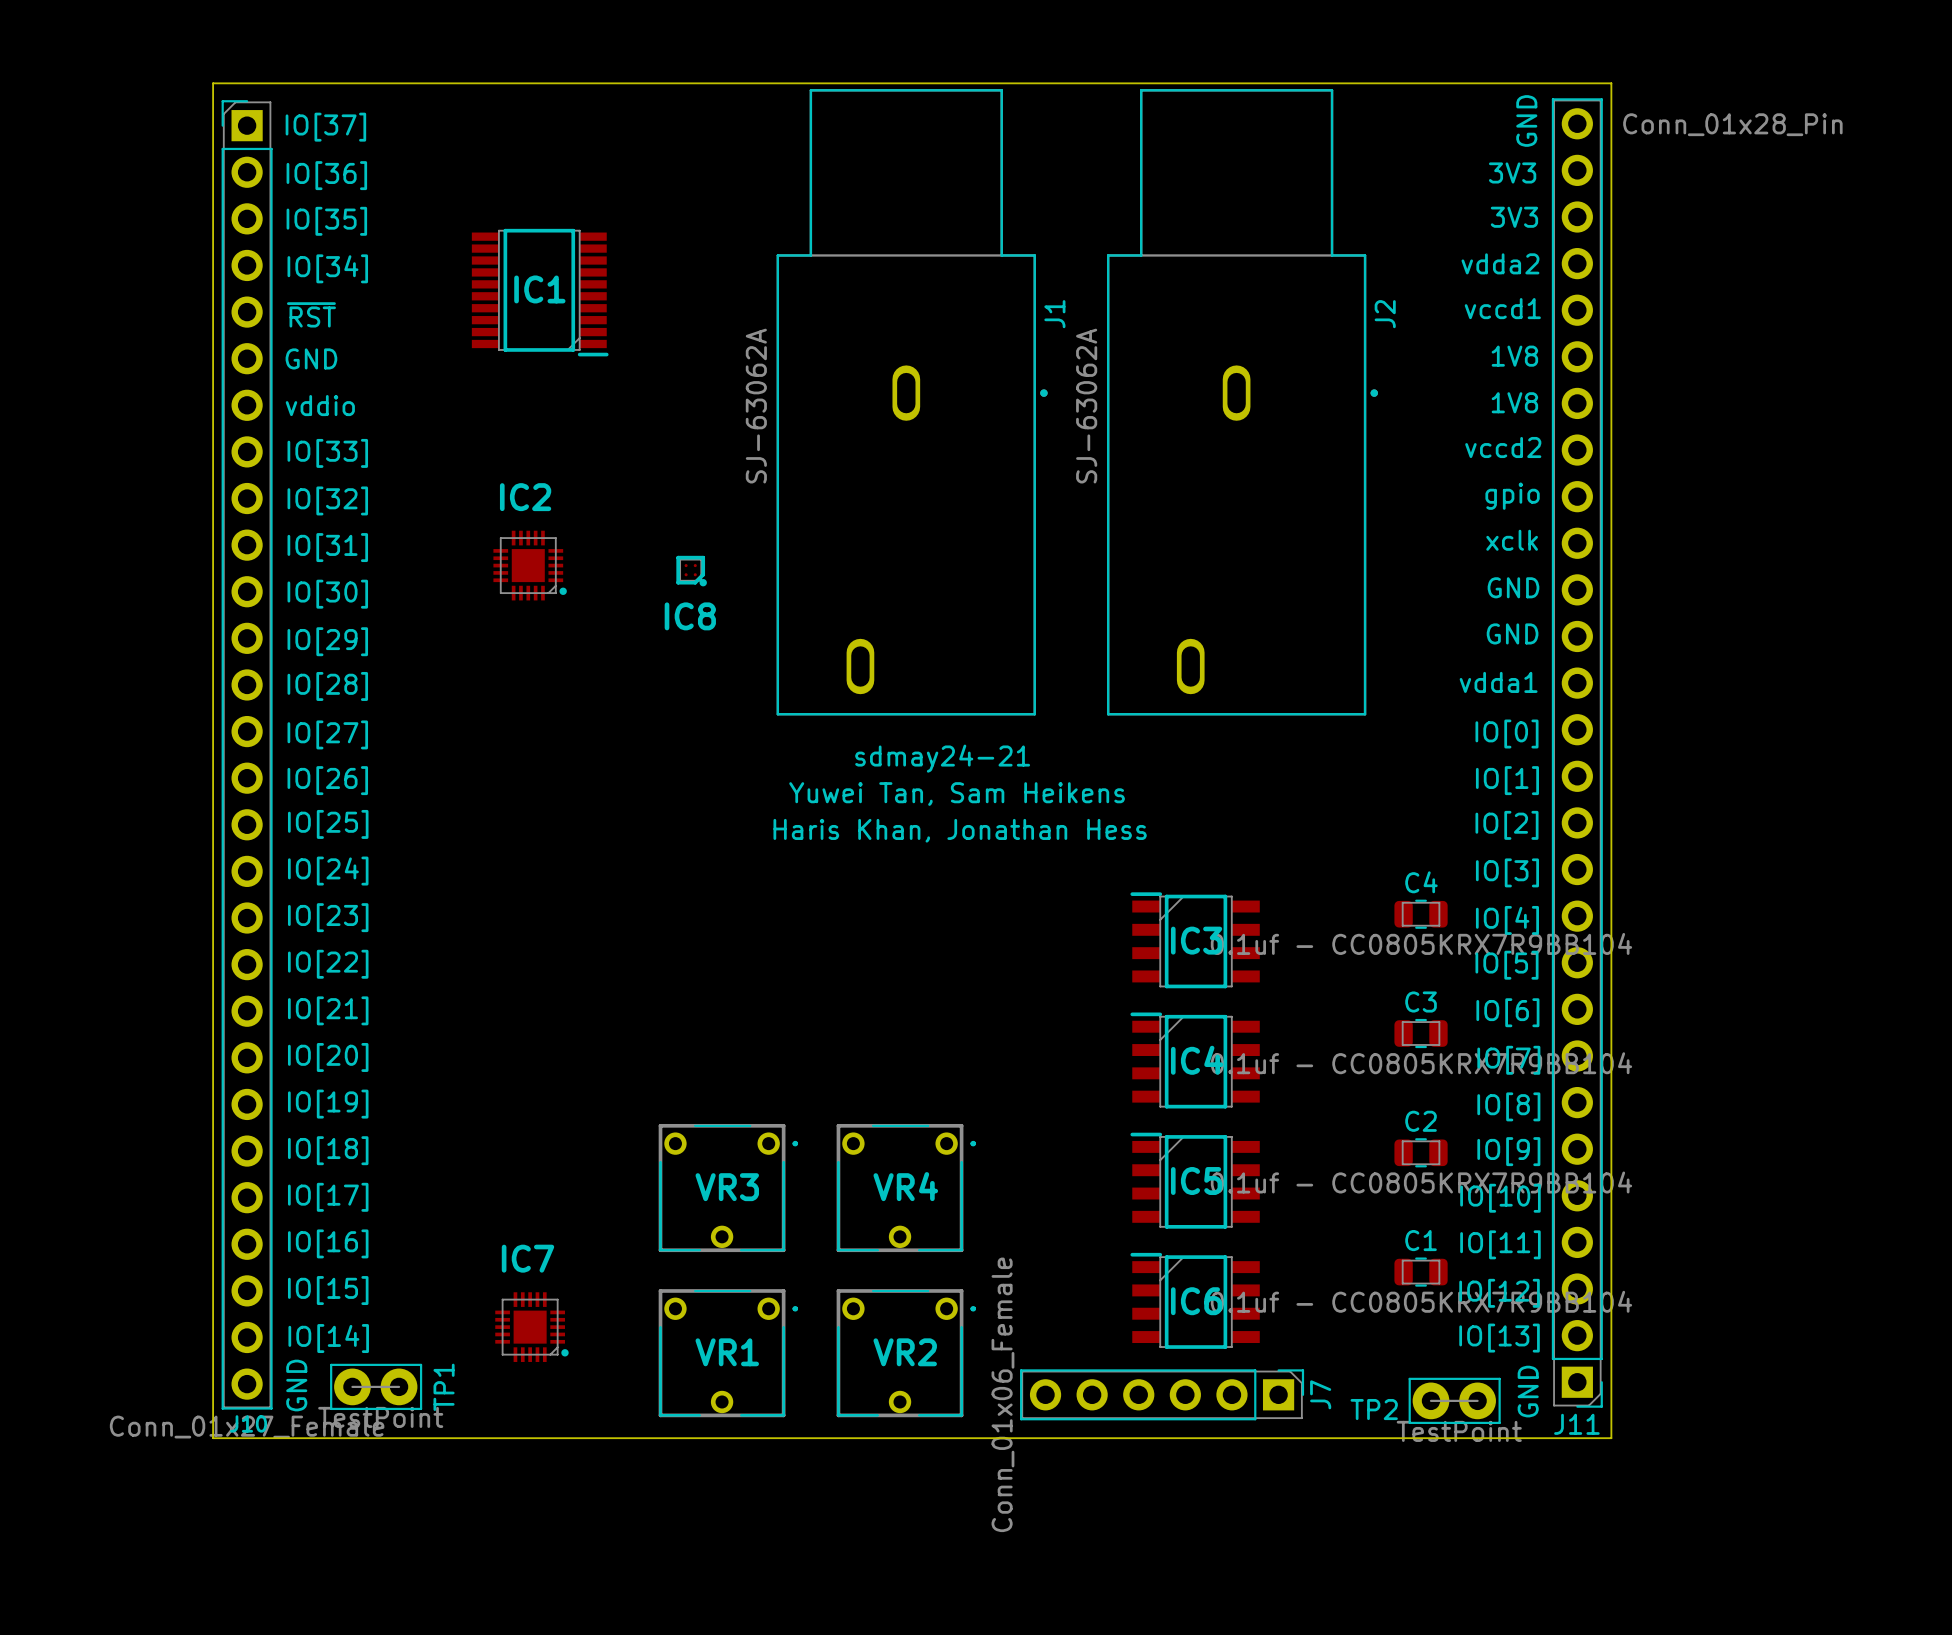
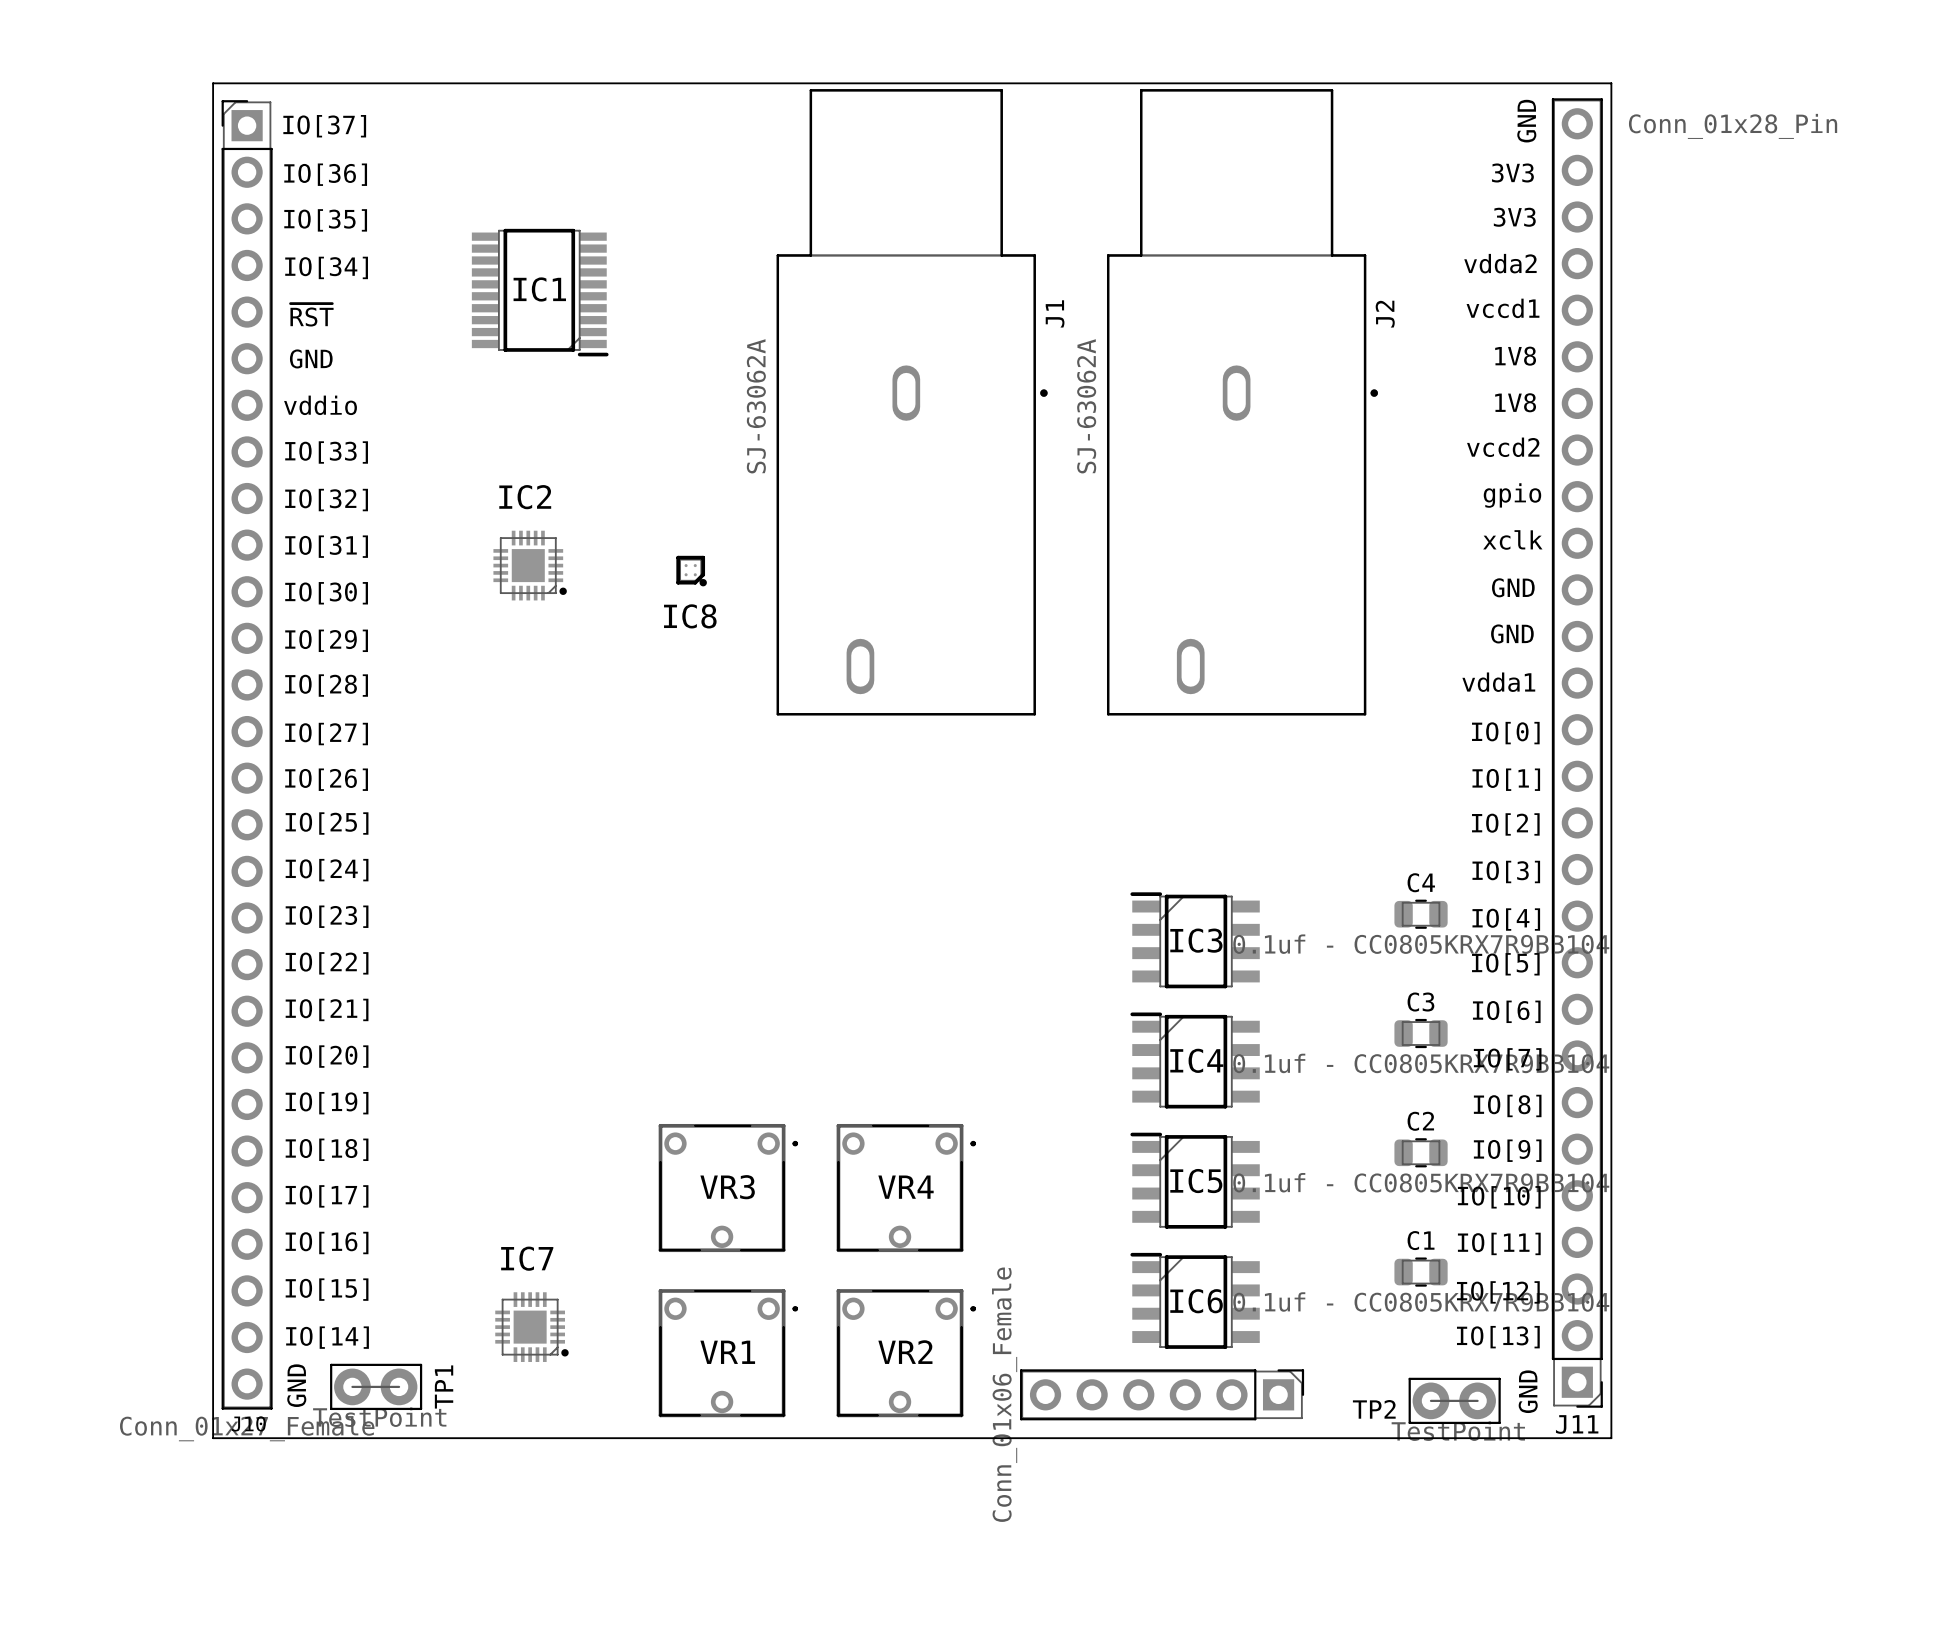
text: sdmay24-21 (942, 758) -> none
text: Yuwei Tan, Sam Heikens (957, 794) -> none
text: Haris Khan, Jonathan Hess (960, 830) -> none
J7 name: J7 (1320, 1394) -> none

